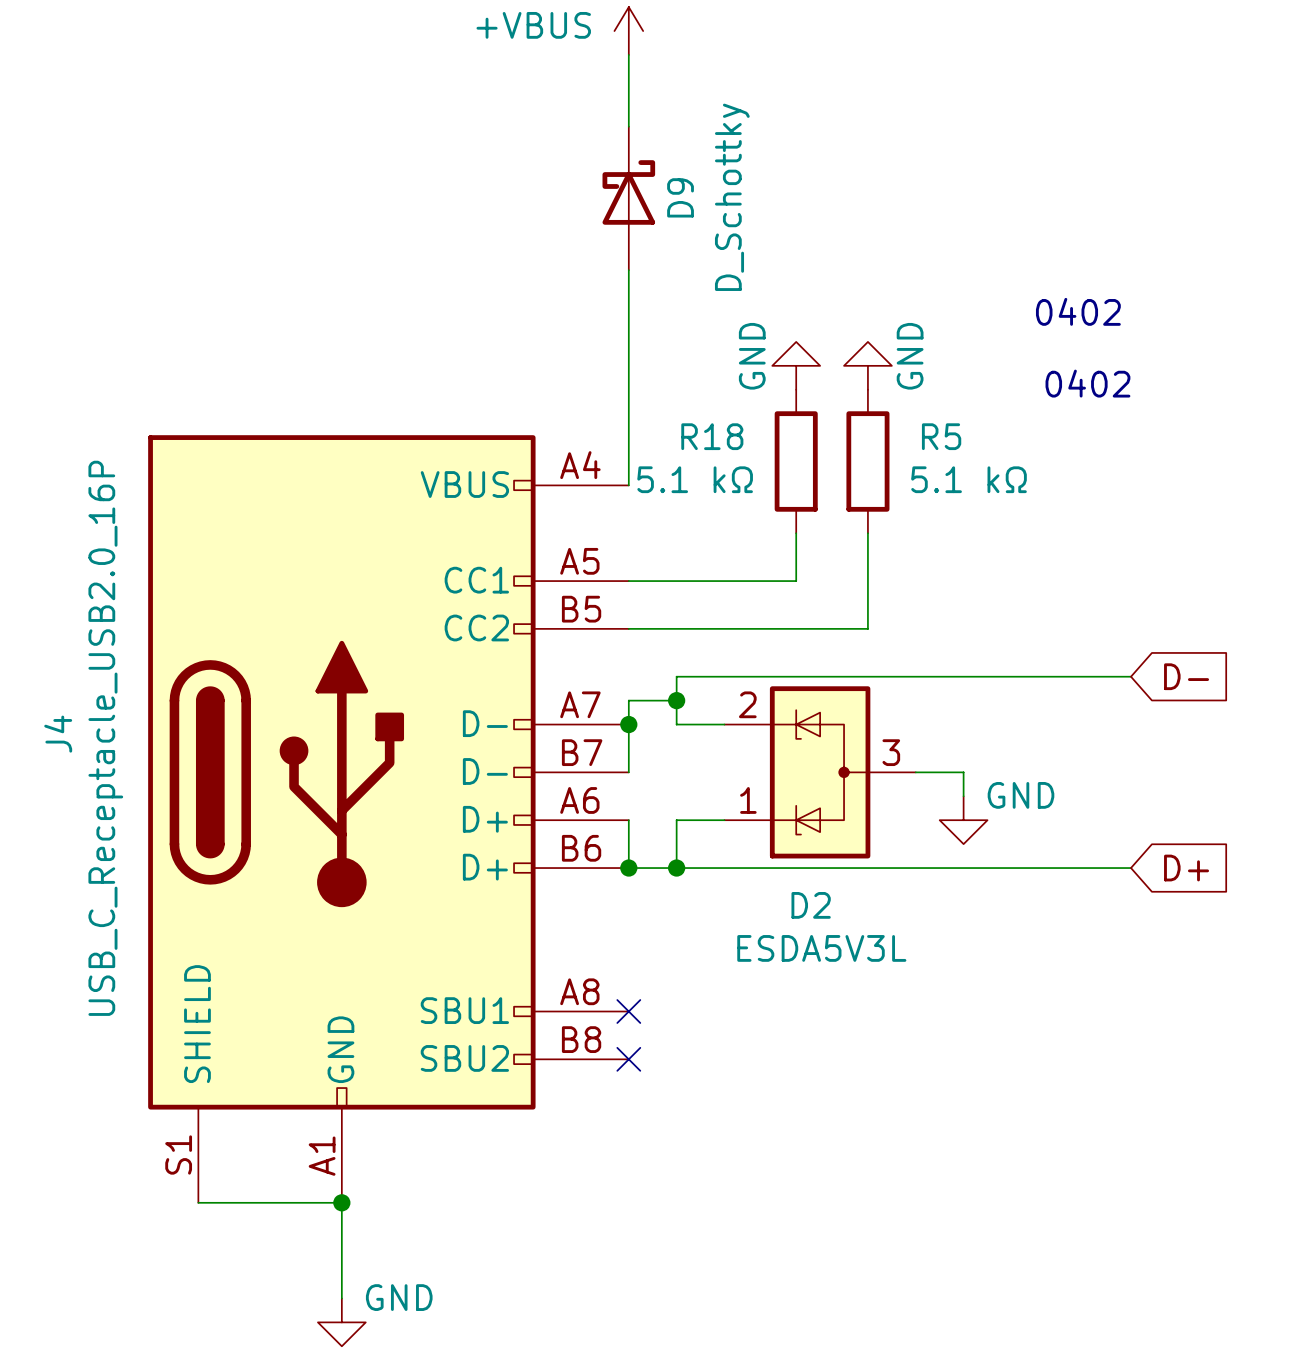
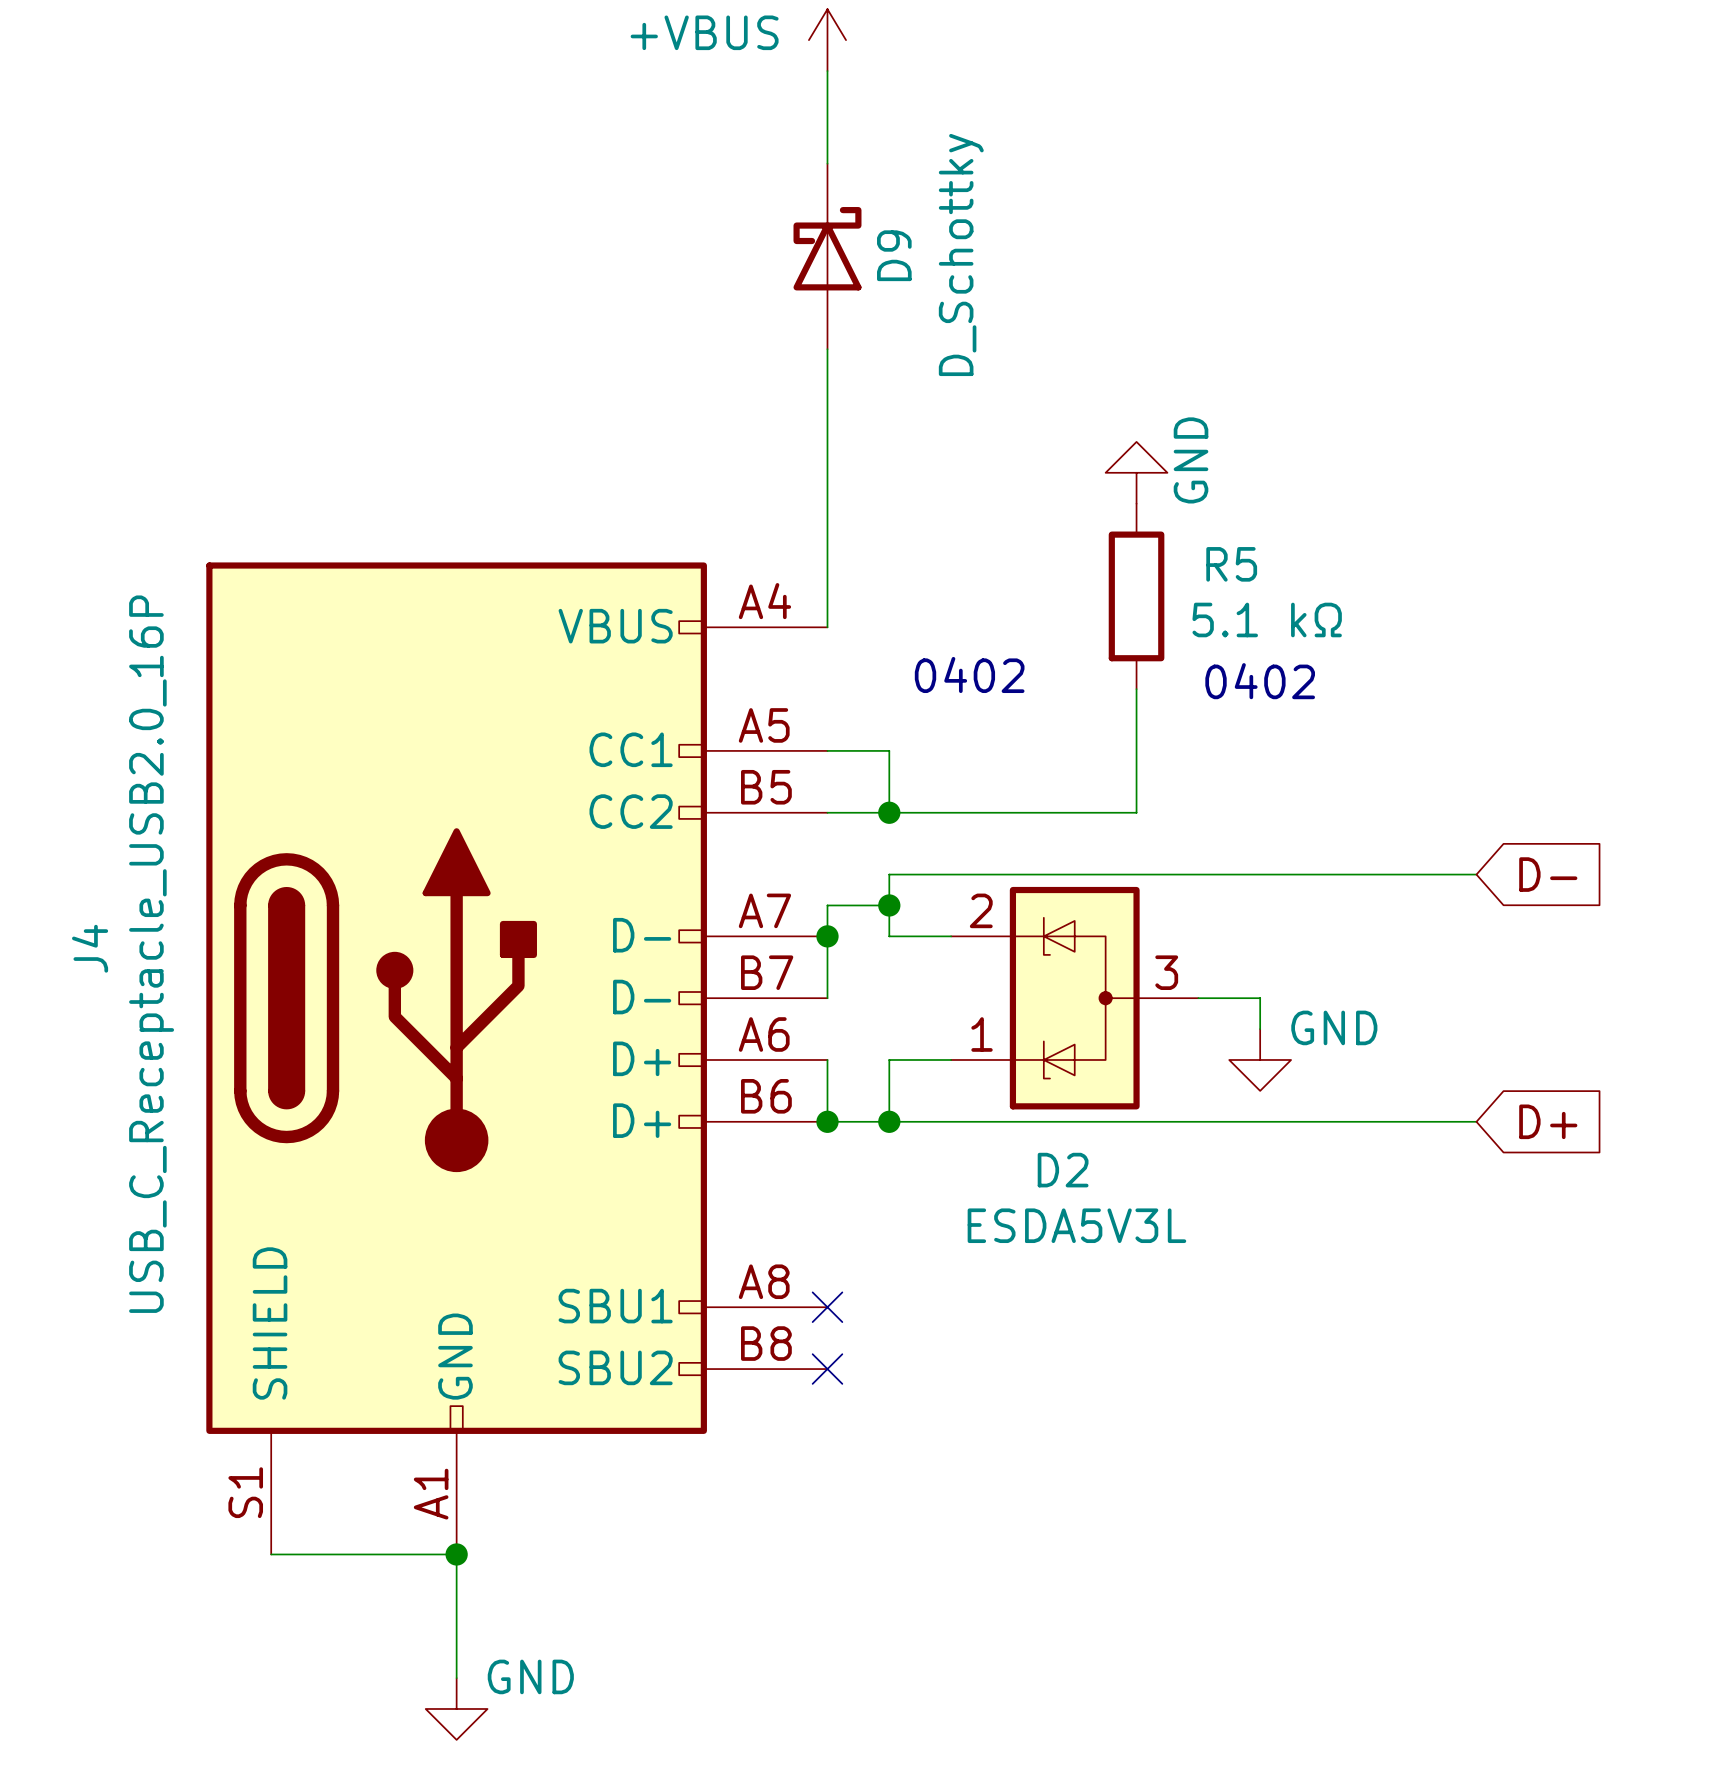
text: 0402 (1078, 311) -> none
power symbol: GND (796, 365) -> none
text: 0402 (1087, 383) -> none
R18: 5.1 kΩ (796, 461) -> none
text: none -> 0402 (969, 674)
text: none -> 0402 (1260, 681)
wire: (796, 533) (796, 581) (676, 581) -> (889, 812) (889, 750)
junction: none -> (889, 812)

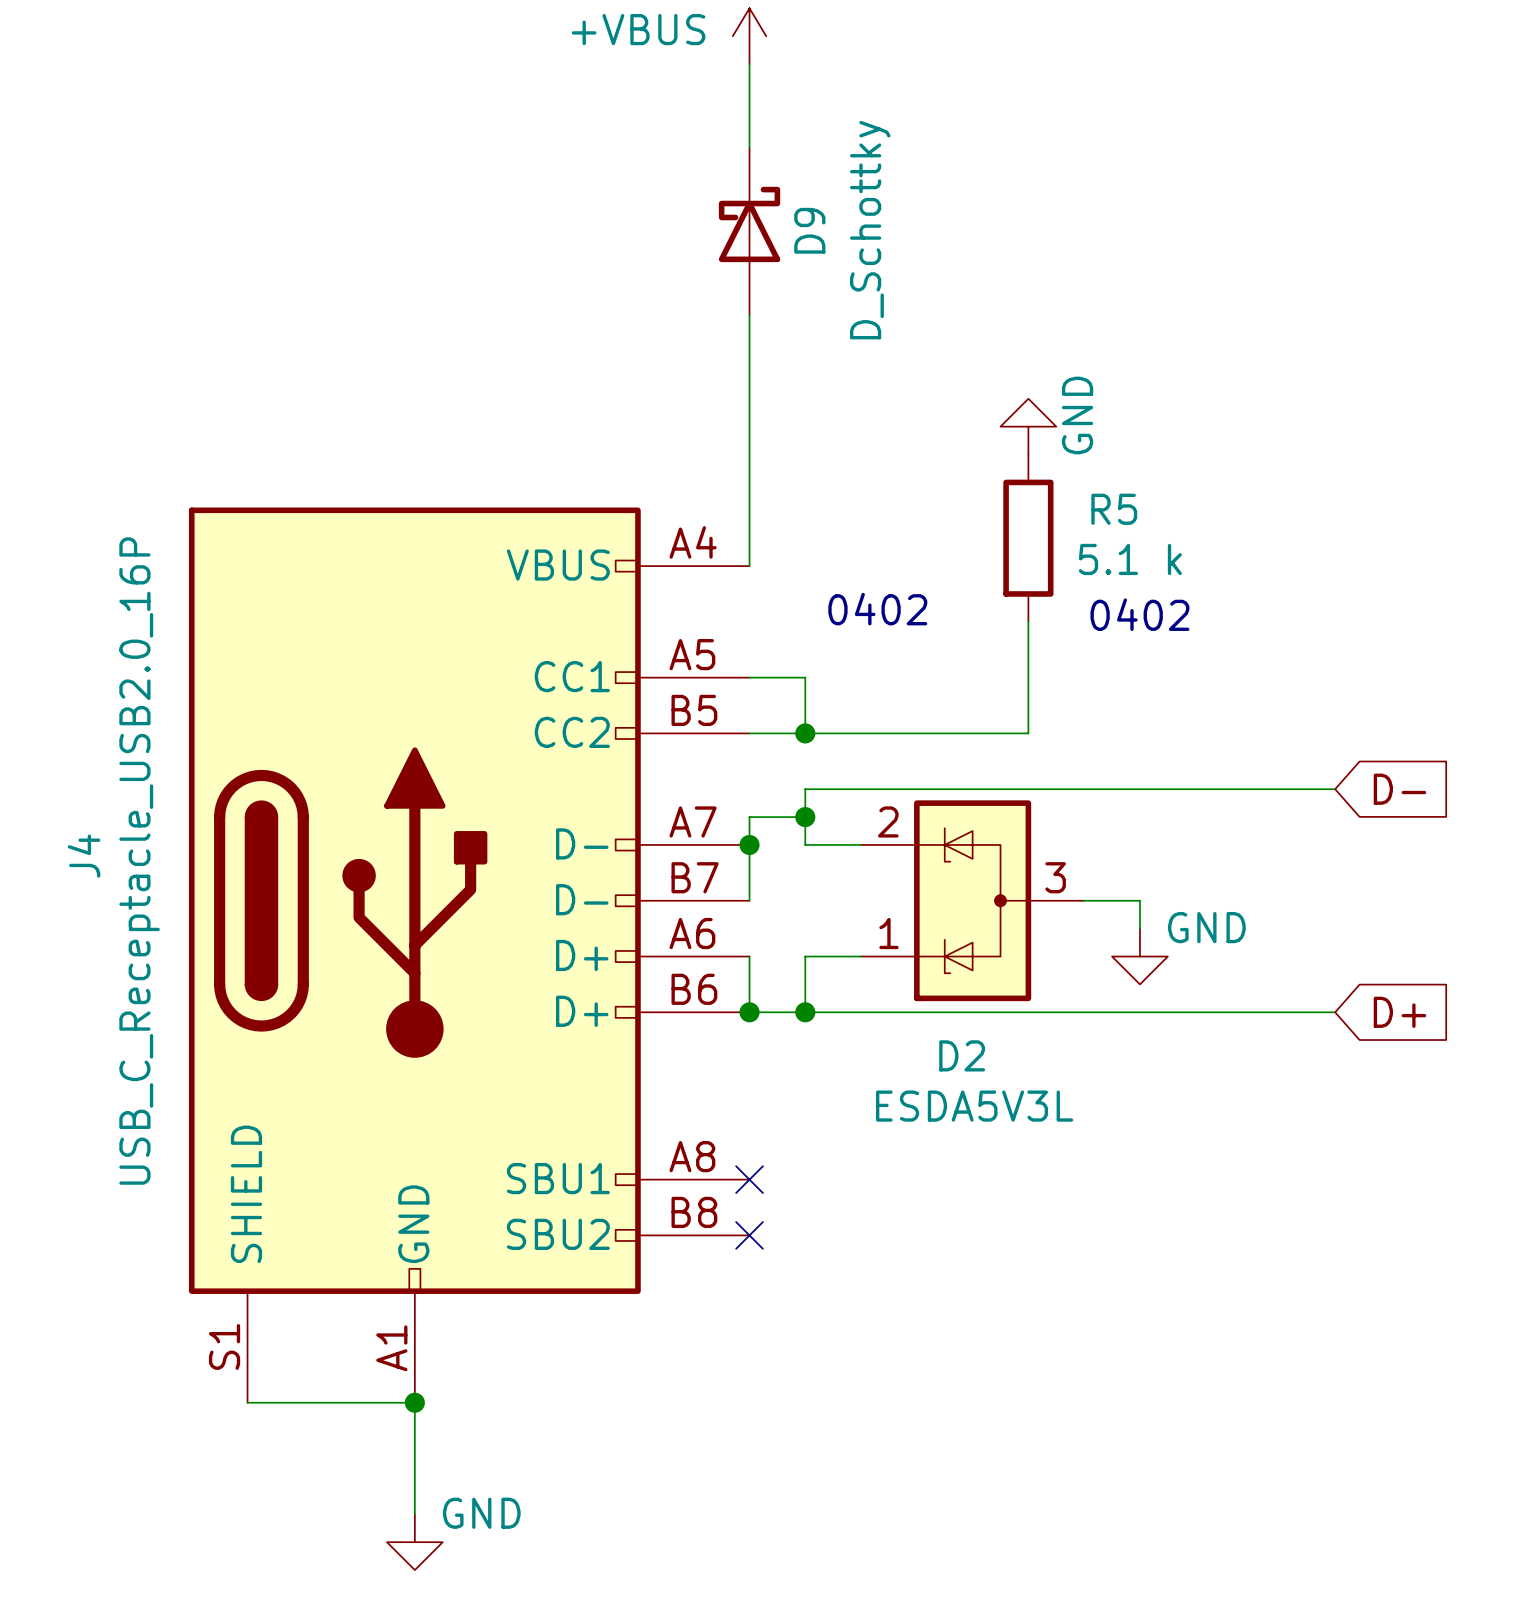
R5 value: 5.1 kΩ (1267, 619) -> 5.1 k (1130, 559)

